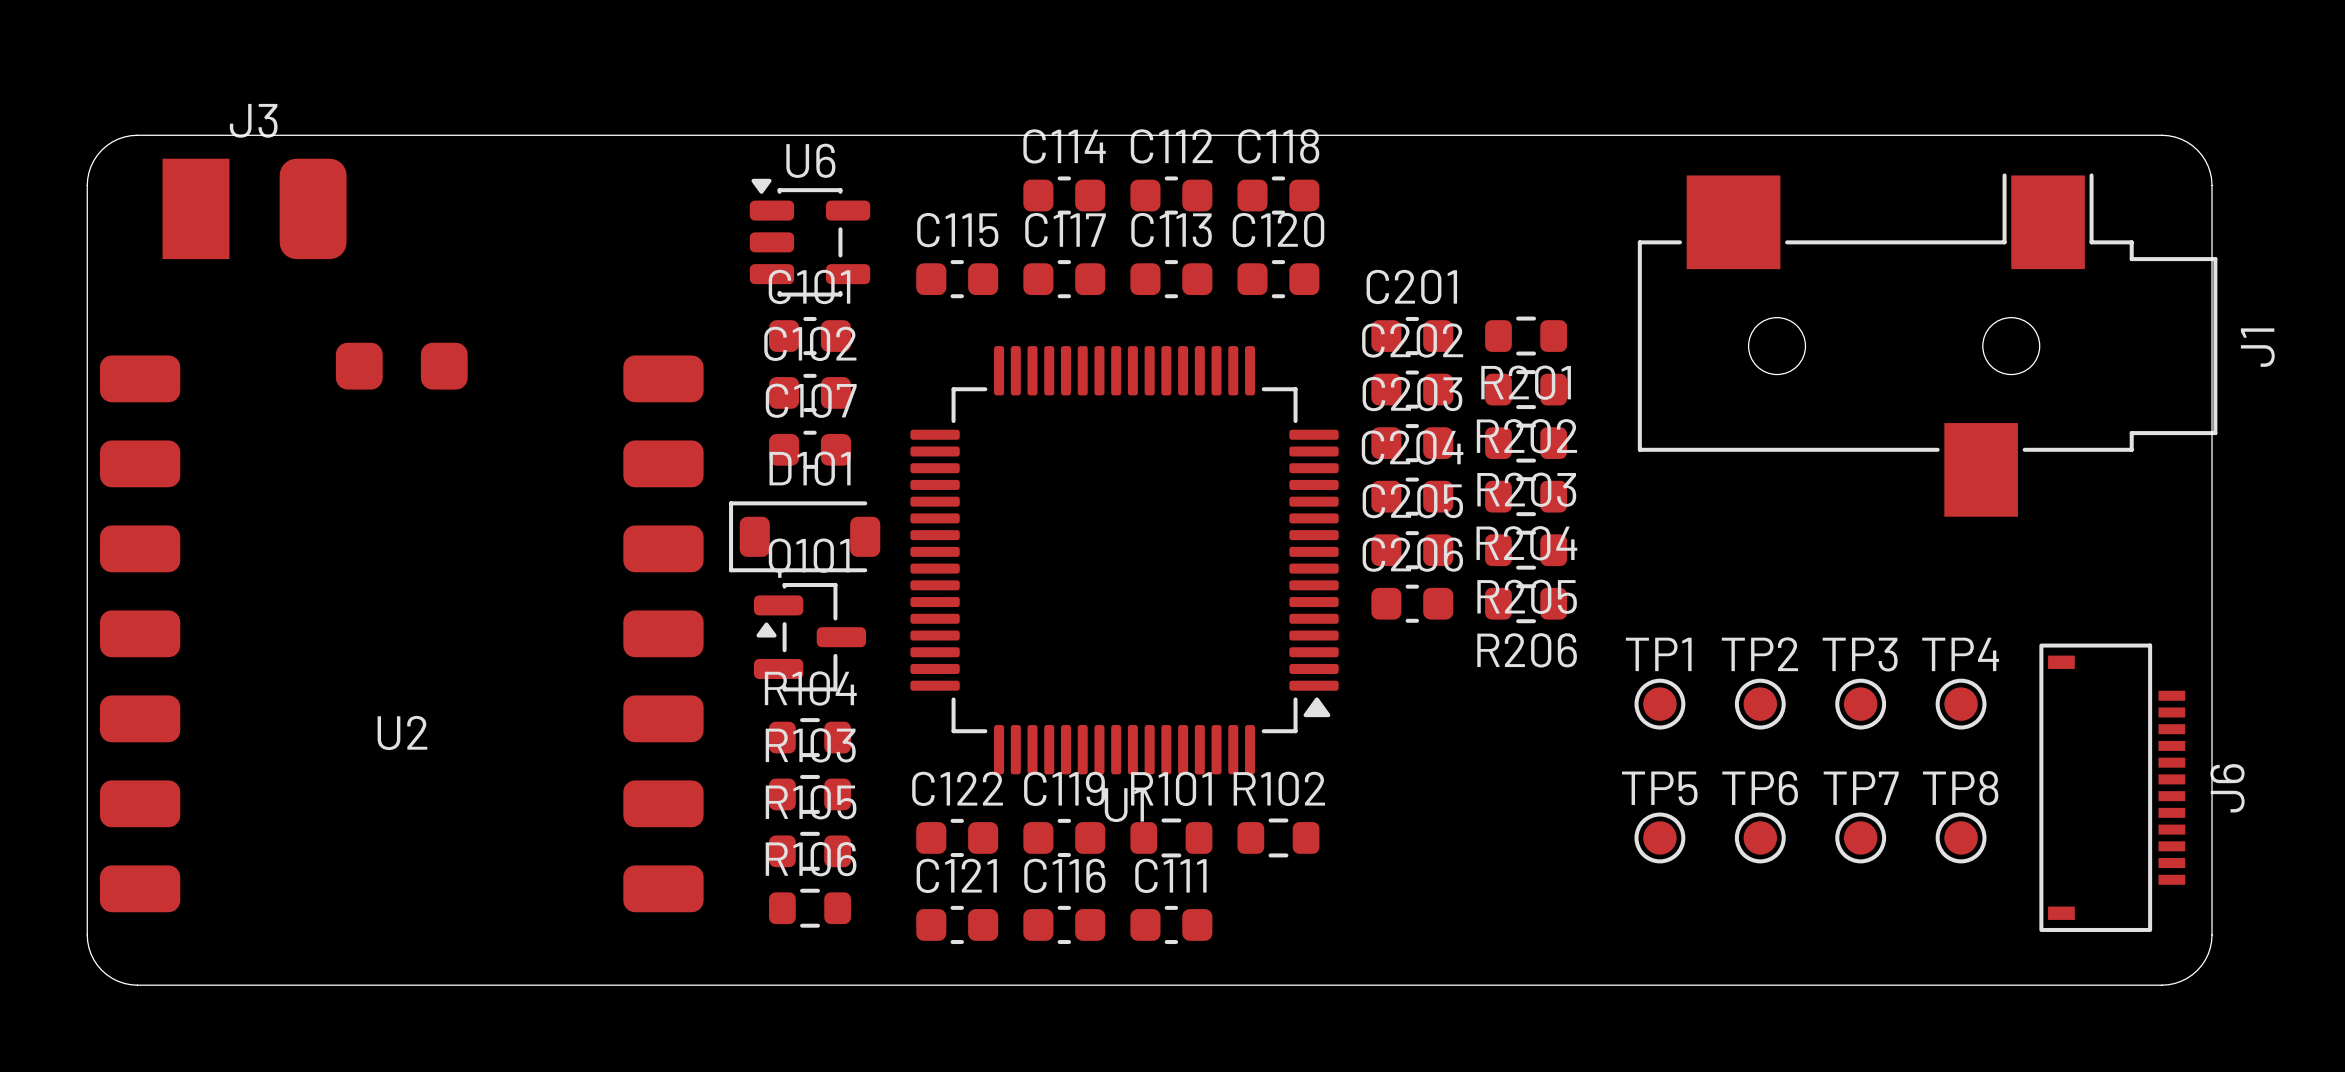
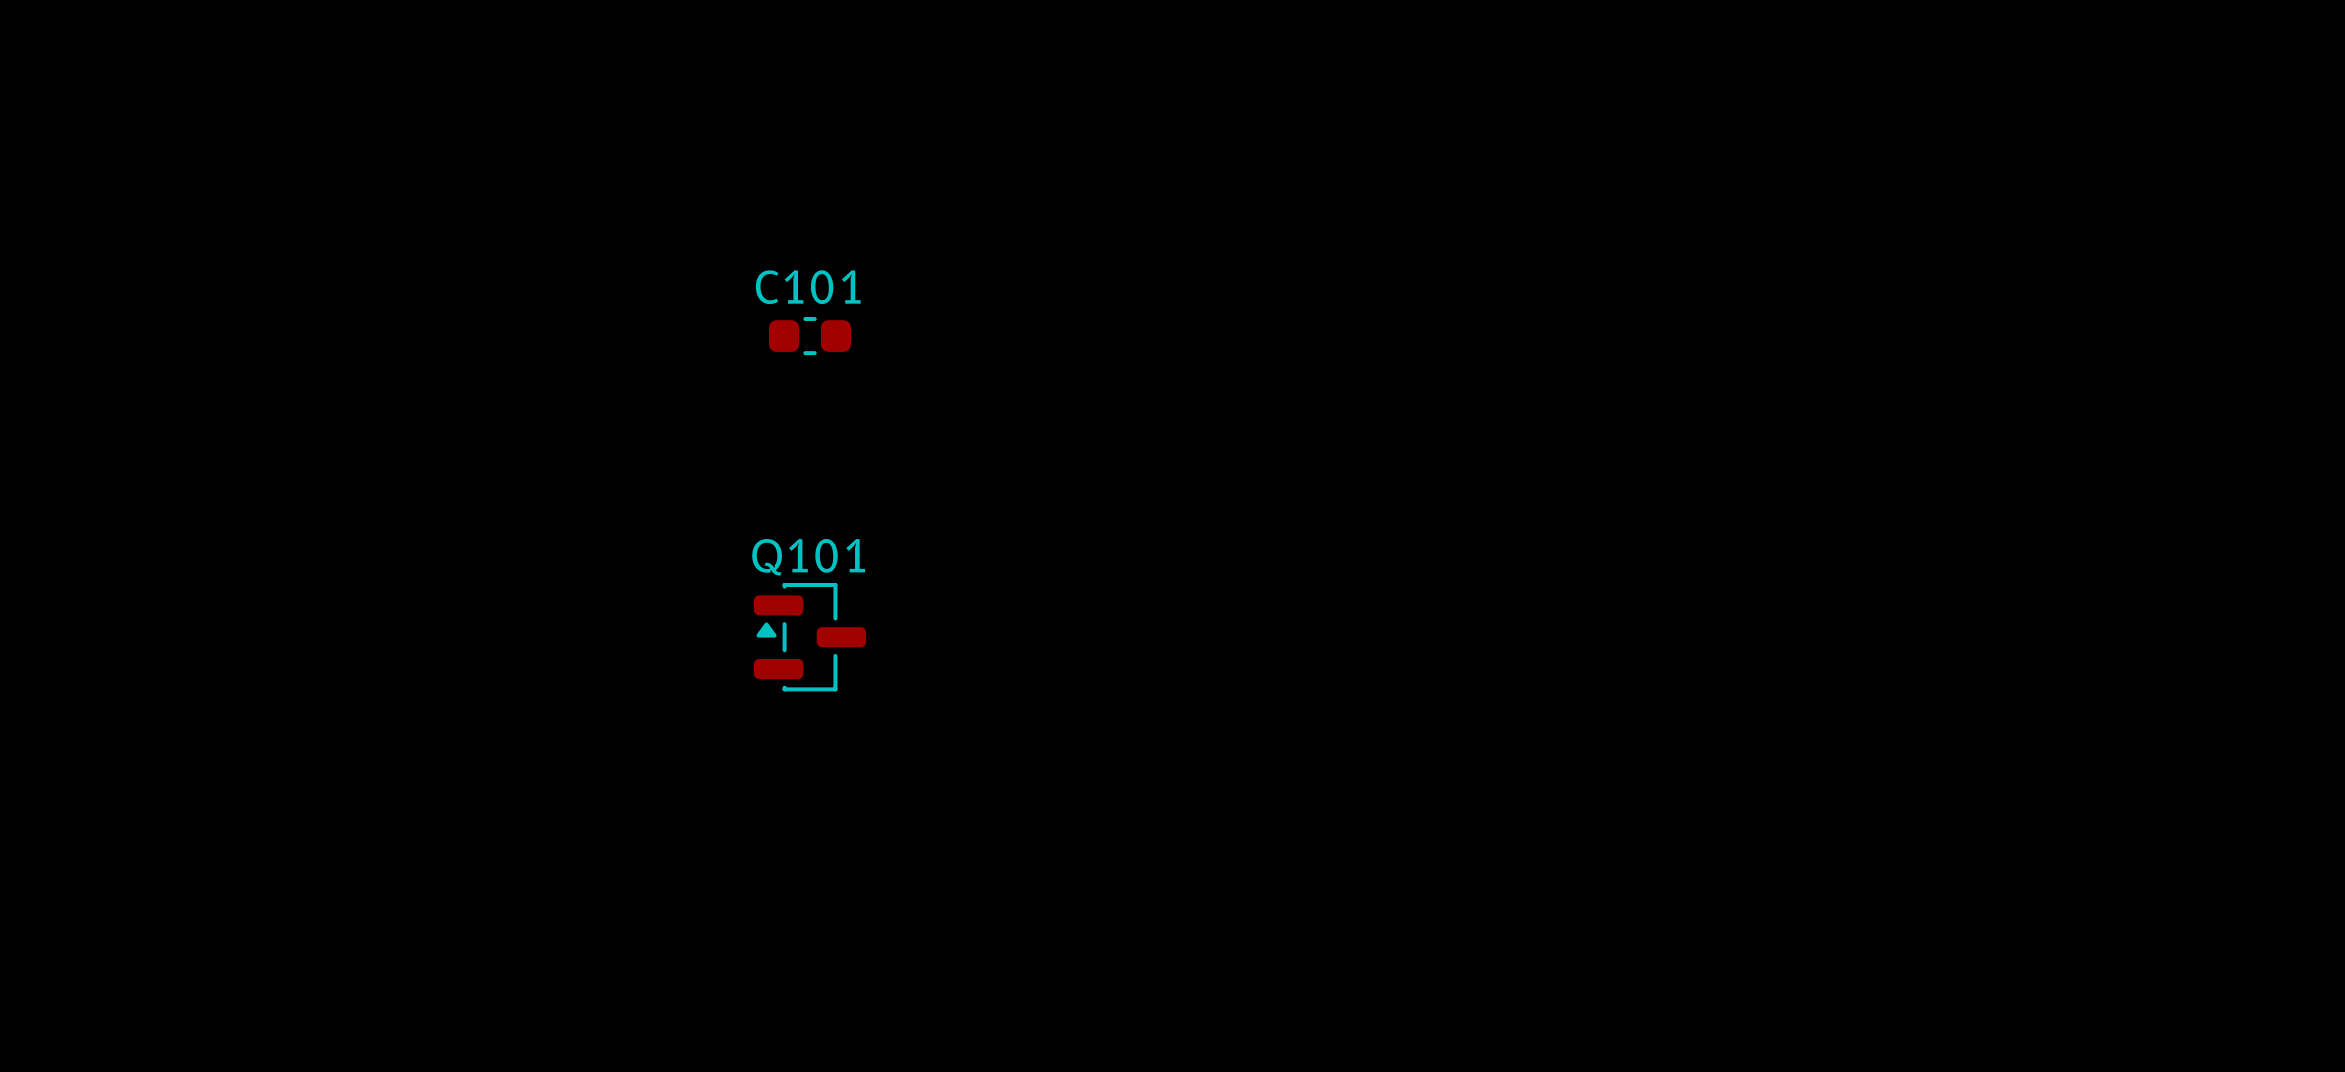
board edge: (137, 135) (2161, 135) (2181, 139) (2192, 145) (2201, 154) (2208, 166) (2212, 185) (2212, 934) (2208, 954) (2201, 965) (2186, 978) (2174, 983) (2161, 985) (137, 985) (118, 981) (106, 974) (93, 960) (88, 947) (87, 934) (87, 185) (91, 166) (101, 149) (118, 139) (137, 135) -> none
C114: (1064, 195) -> none
C112: (1171, 195) -> none
C118: (1278, 195) -> none
J3: (254, 208) -> none
U6: (810, 237) -> none
C115: (957, 279) -> none
C117: (1064, 279) -> none
C113: (1171, 279) -> none
C120: (1278, 279) -> none
C201: (1412, 336) -> none
R201: (1526, 336) -> none
J1: (1927, 345) -> none
C202: (1412, 389) -> none
R202: (1526, 389) -> none
C102: (810, 392) -> none
C203: (1412, 443) -> none
R203: (1526, 443) -> none
C107: (810, 449) -> none
C204: (1412, 496) -> none
R204: (1526, 496) -> none
D101: (804, 536) -> none
C205: (1412, 550) -> none
R205: (1526, 550) -> none
U1: (1124, 560) -> none
C206: (1412, 603) -> none
R206: (1526, 603) -> none
U2: (401, 627) -> none
TP1: (1659, 704) -> none
TP2: (1760, 704) -> none
TP3: (1860, 704) -> none
TP4: (1961, 704) -> none
R104: (810, 737) -> none
J6: (2112, 787) -> none
R103: (810, 794) -> none
C122: (957, 837) -> none
C119: (1064, 837) -> none
R101: (1171, 837) -> none
R102: (1278, 837) -> none
TP5: (1659, 837) -> none
TP6: (1760, 837) -> none
TP7: (1860, 837) -> none
TP8: (1961, 837) -> none
R105: (810, 851) -> none
R106: (810, 908) -> none
C121: (957, 924) -> none
C116: (1064, 924) -> none
C111: (1171, 924) -> none

